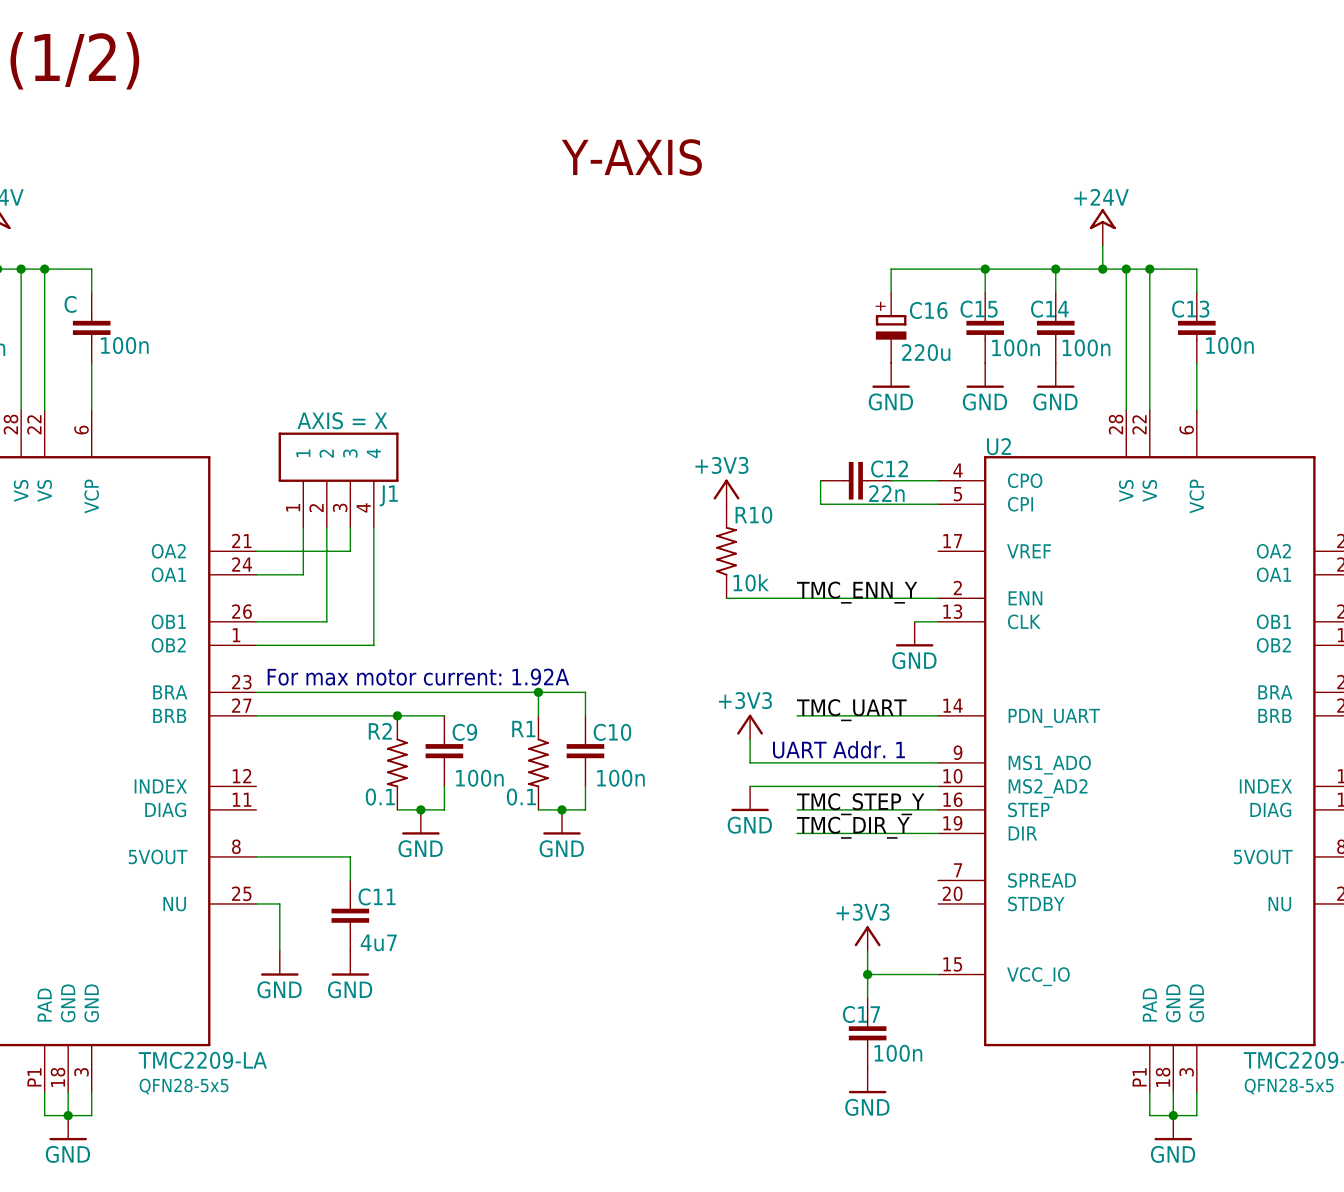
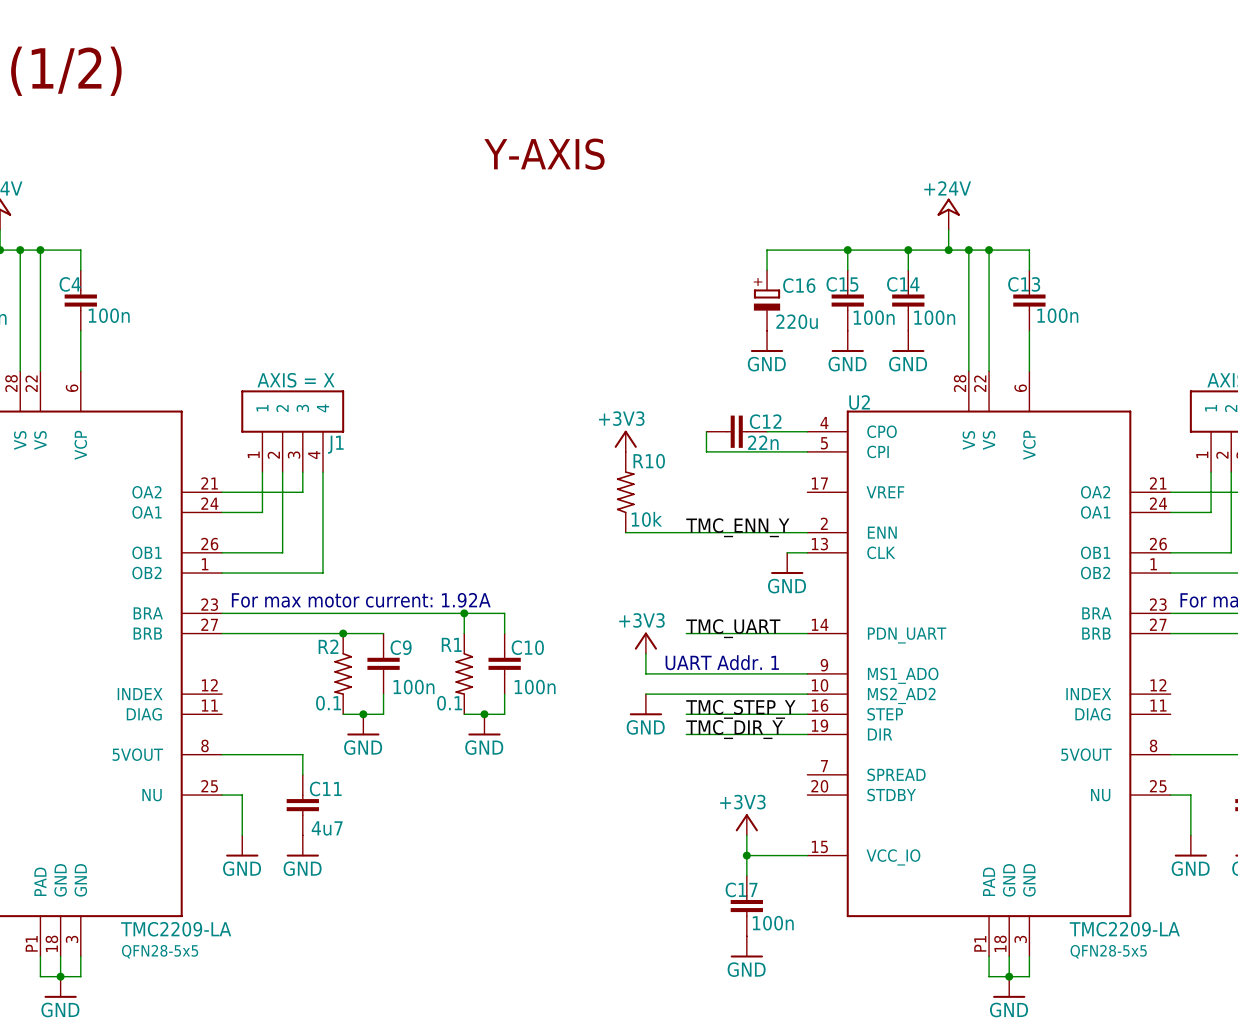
C4 value: C (70, 304) -> none
C4 name: none -> C4 (70, 284)

